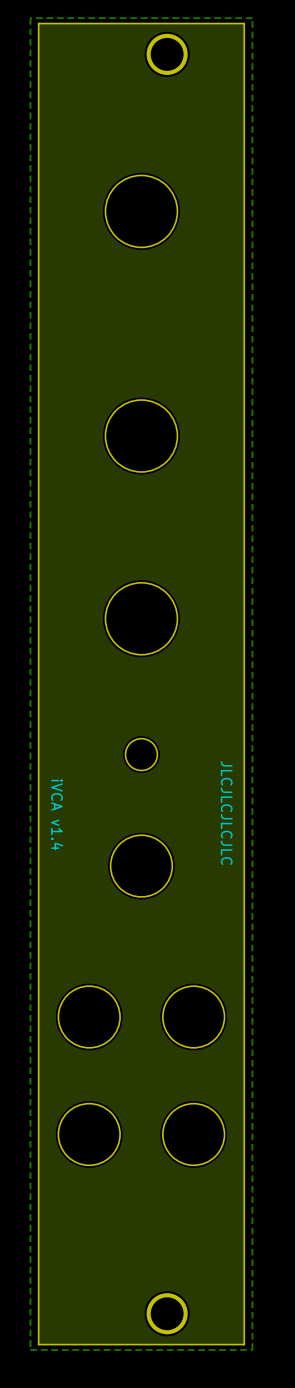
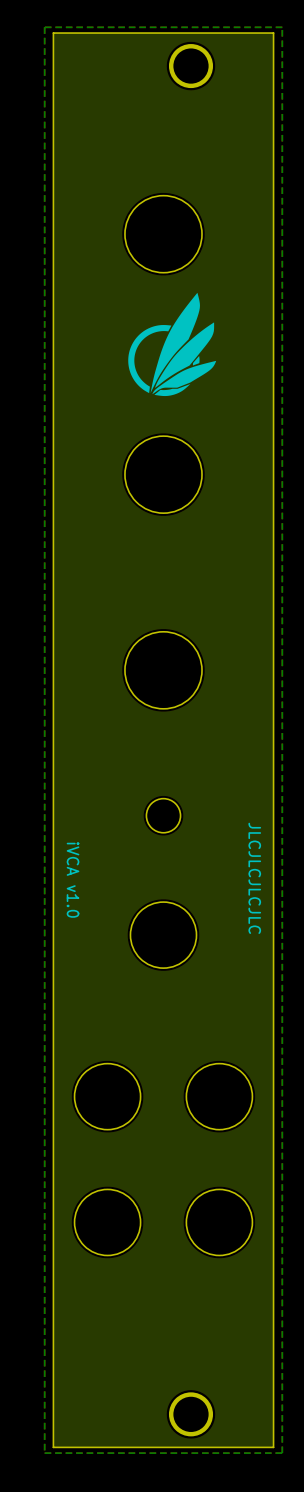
drawing: none -> [128, 292, 217, 397]
text: iVCA v1.4 (57, 814) -> iVCA v1.0 (73, 879)

